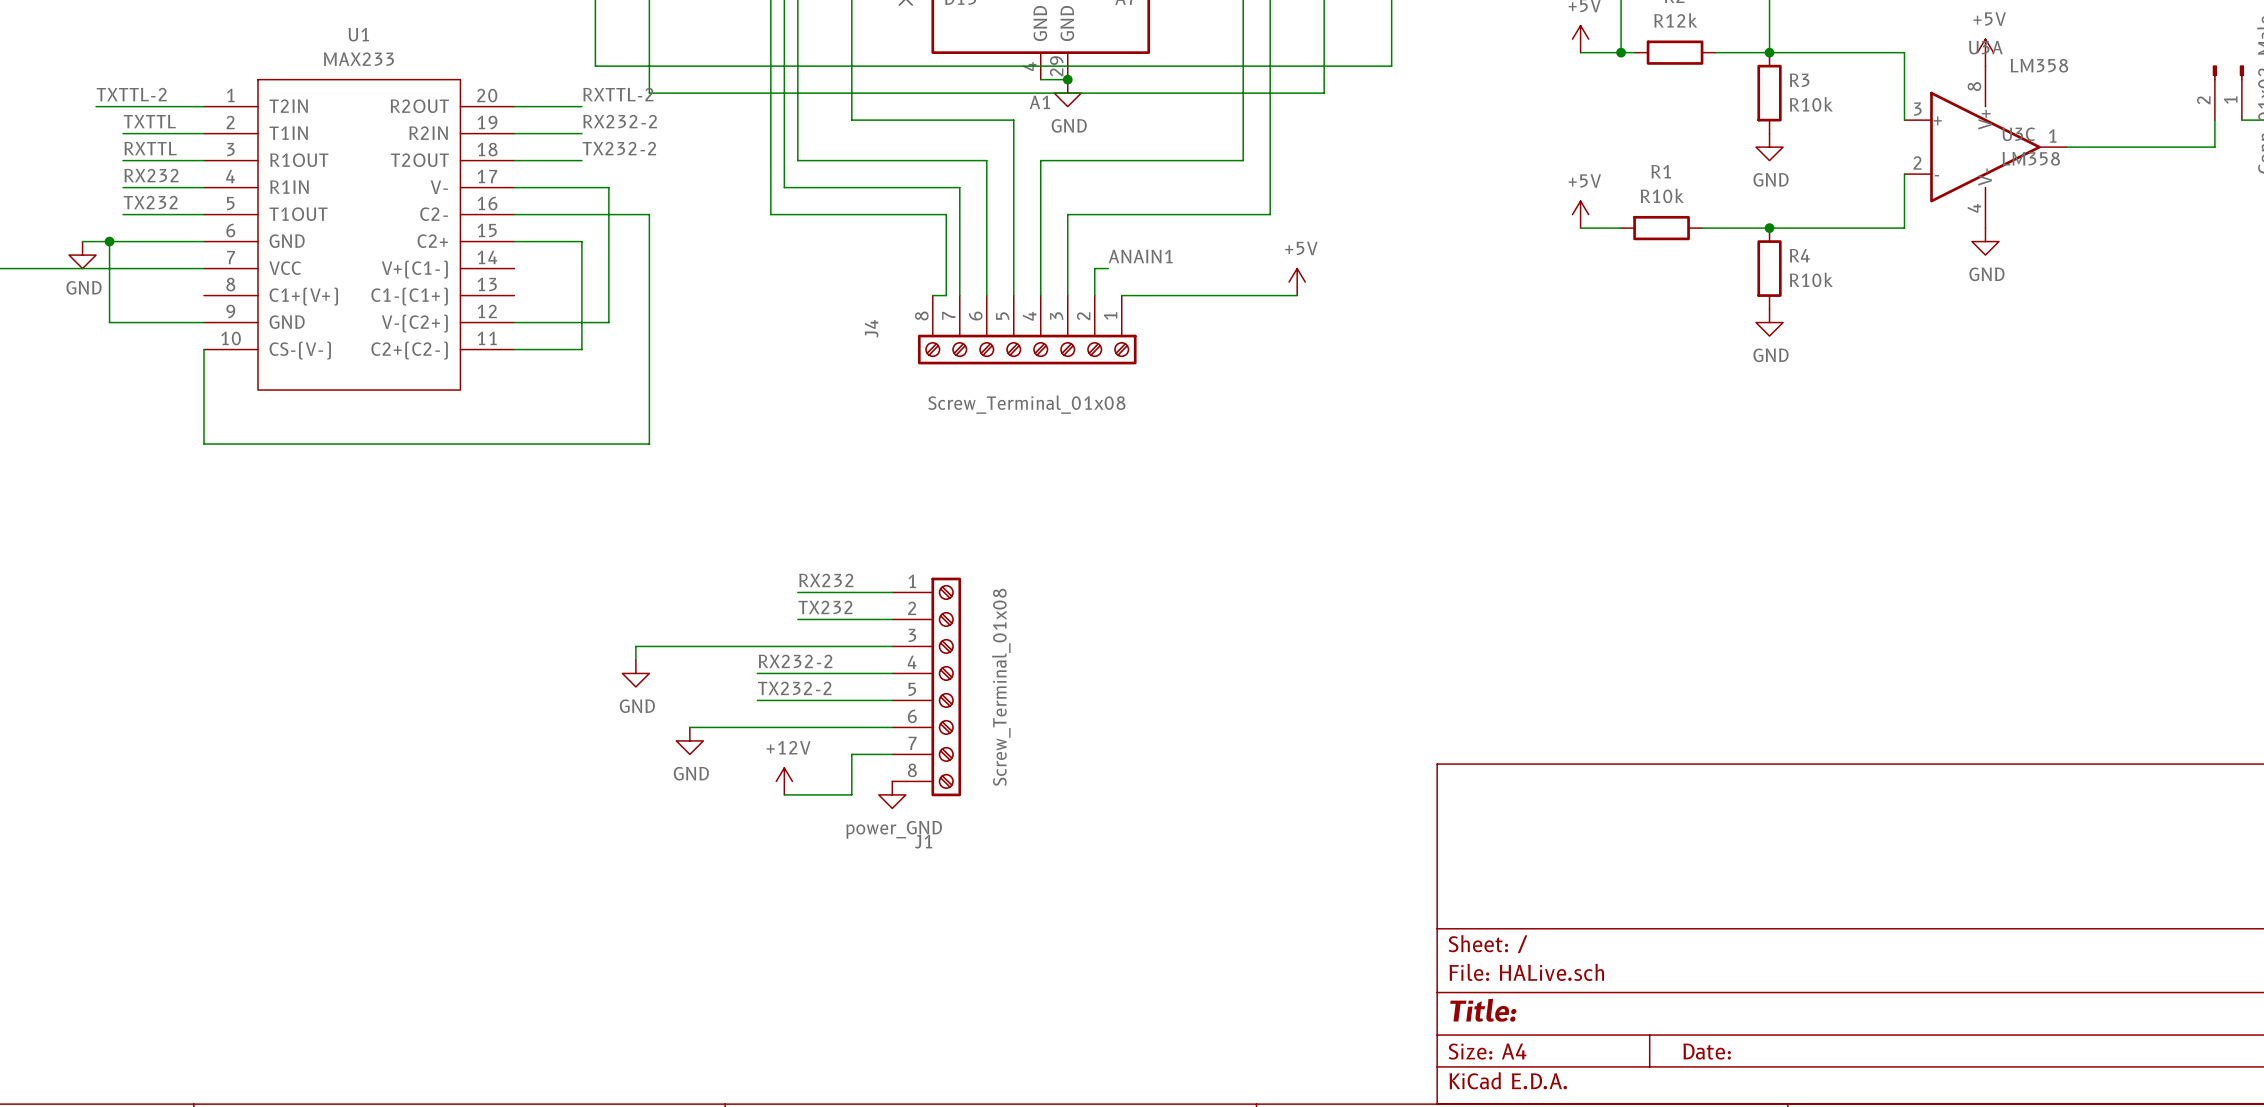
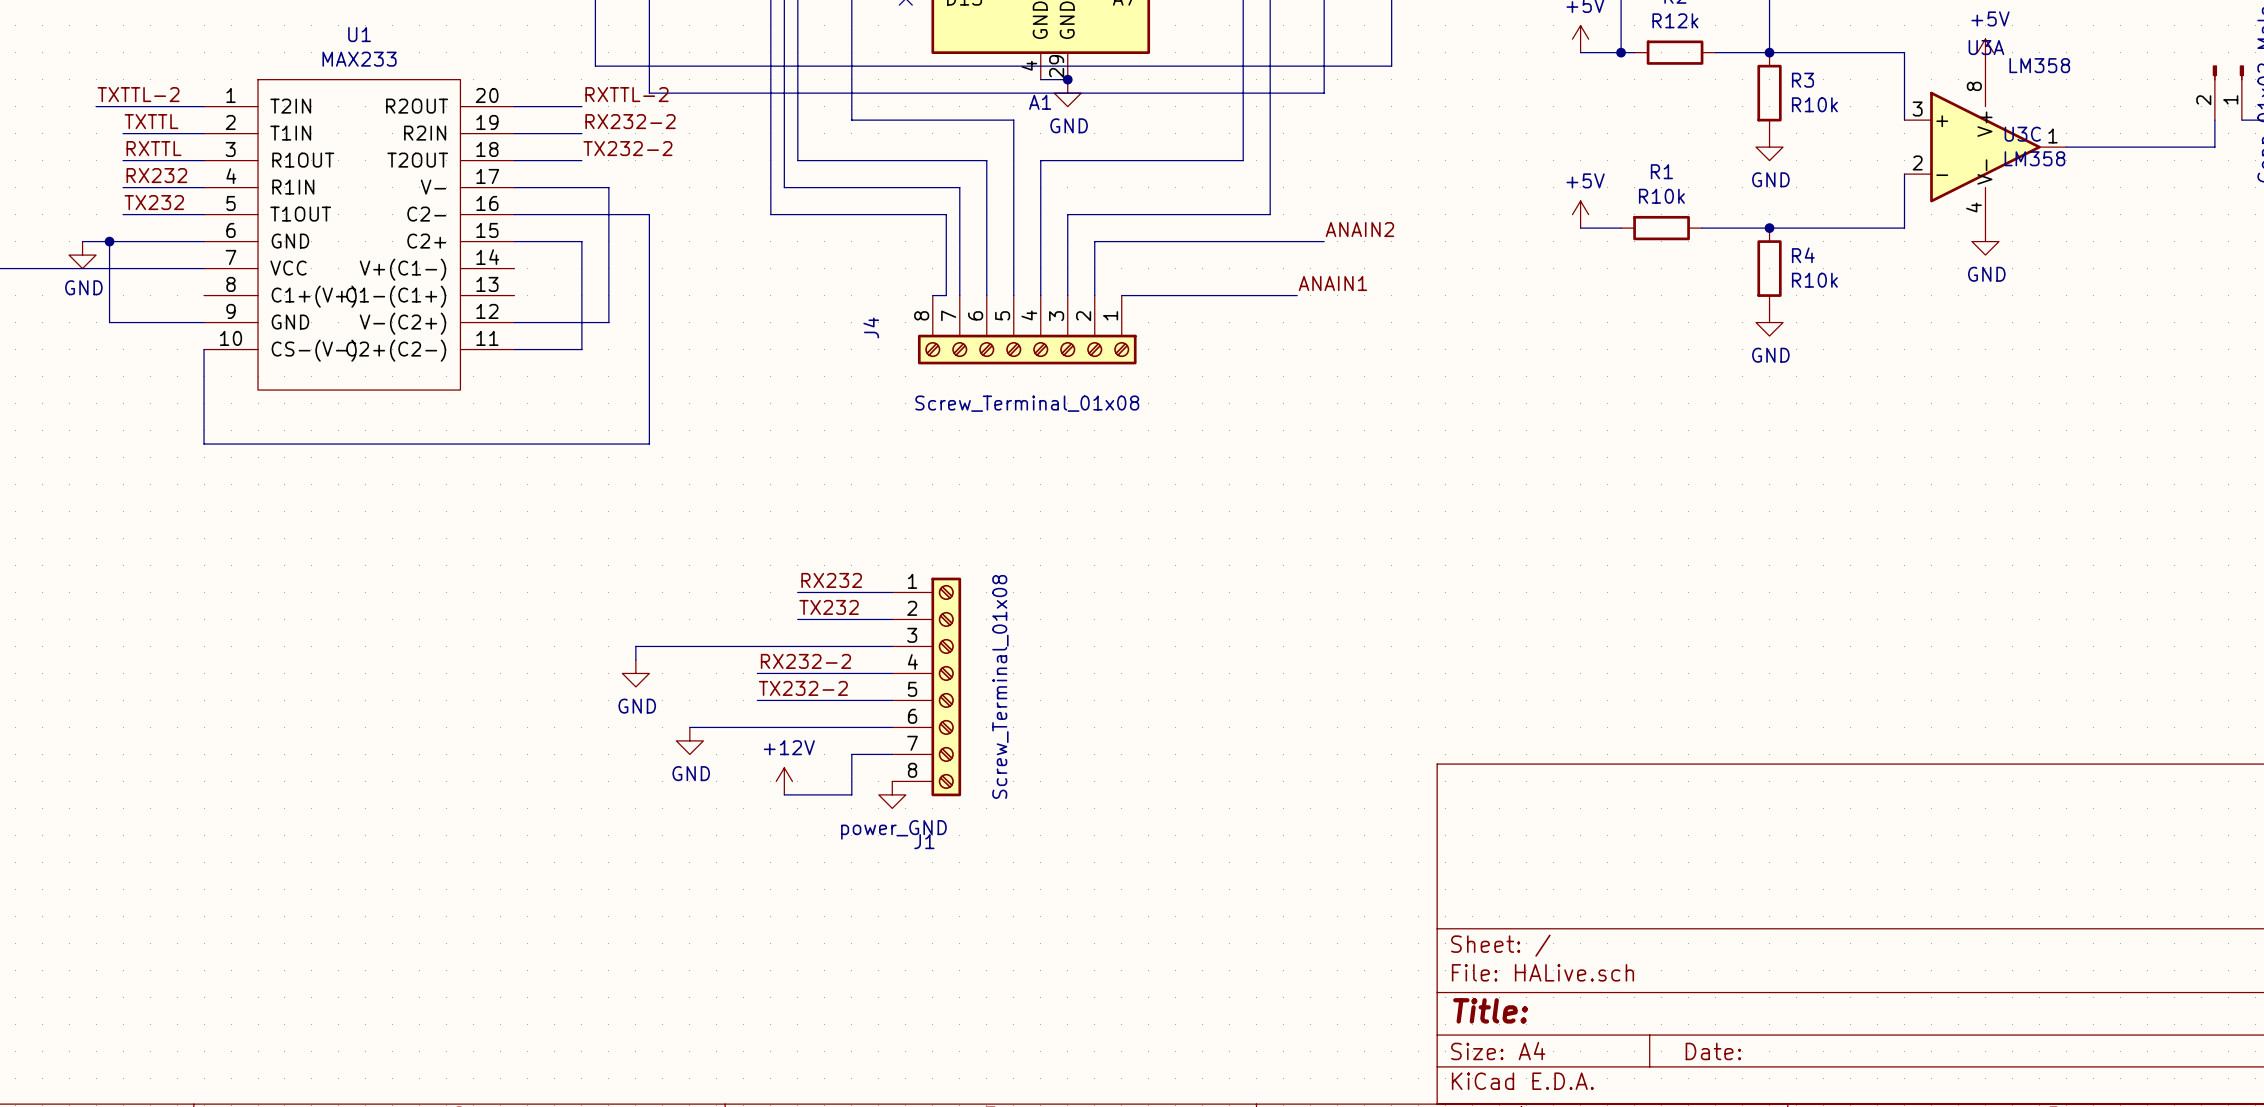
label: none -> ANAIN2 (1359, 229)
label position: ANAIN1 (1140, 256) -> ANAIN1 (1332, 283)
wire: (1094, 268) (1108, 268) -> (1094, 268) (1094, 241) (1324, 241)
power symbol: +5V (1297, 282) -> none

